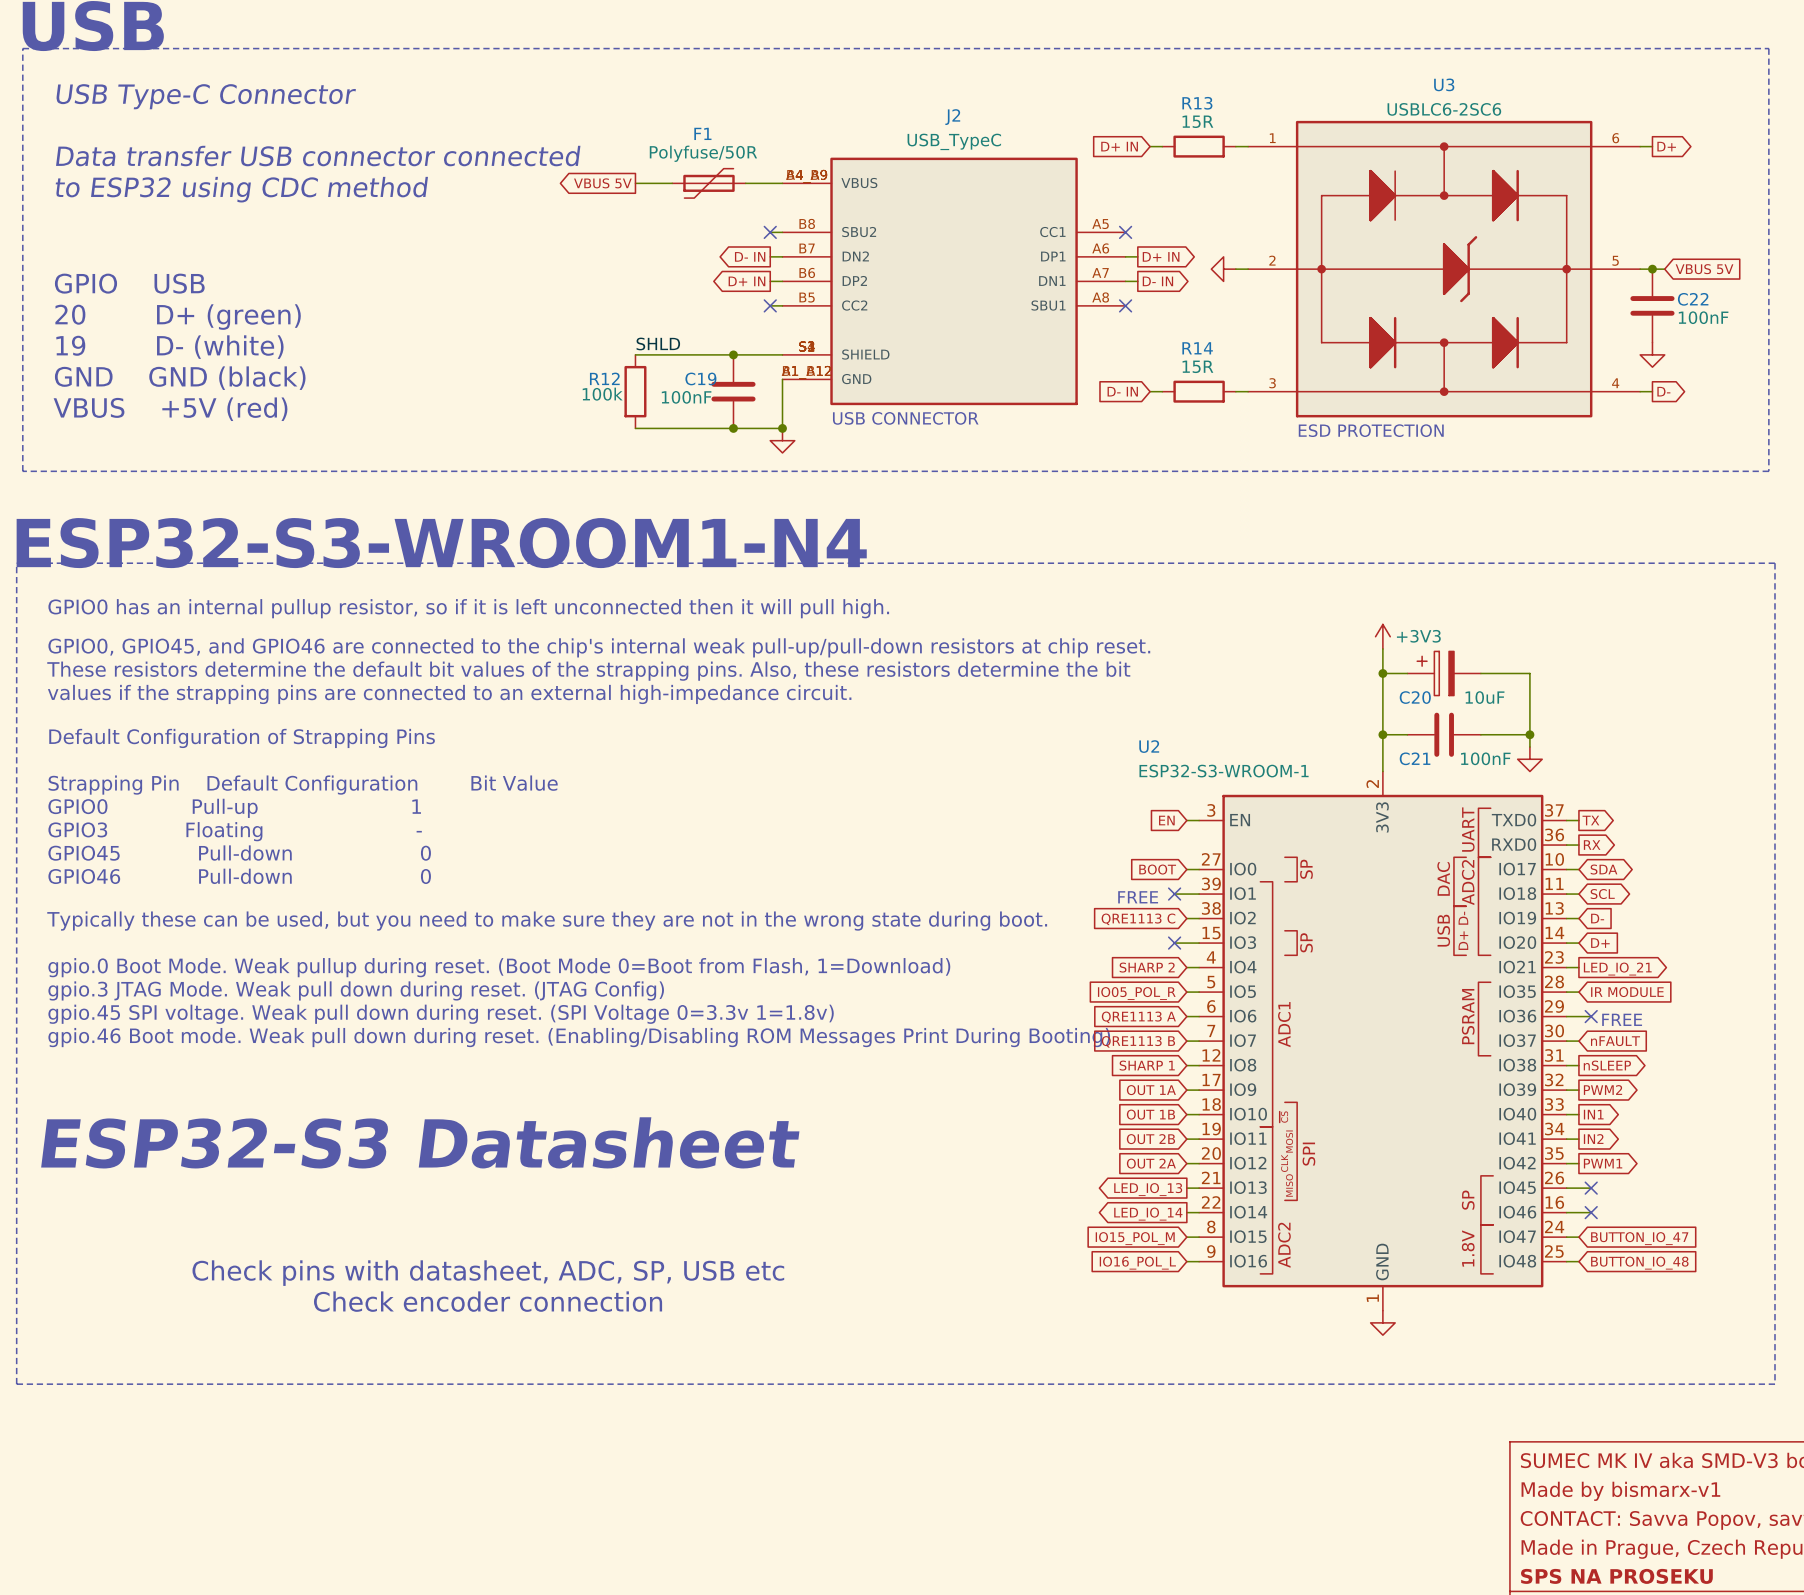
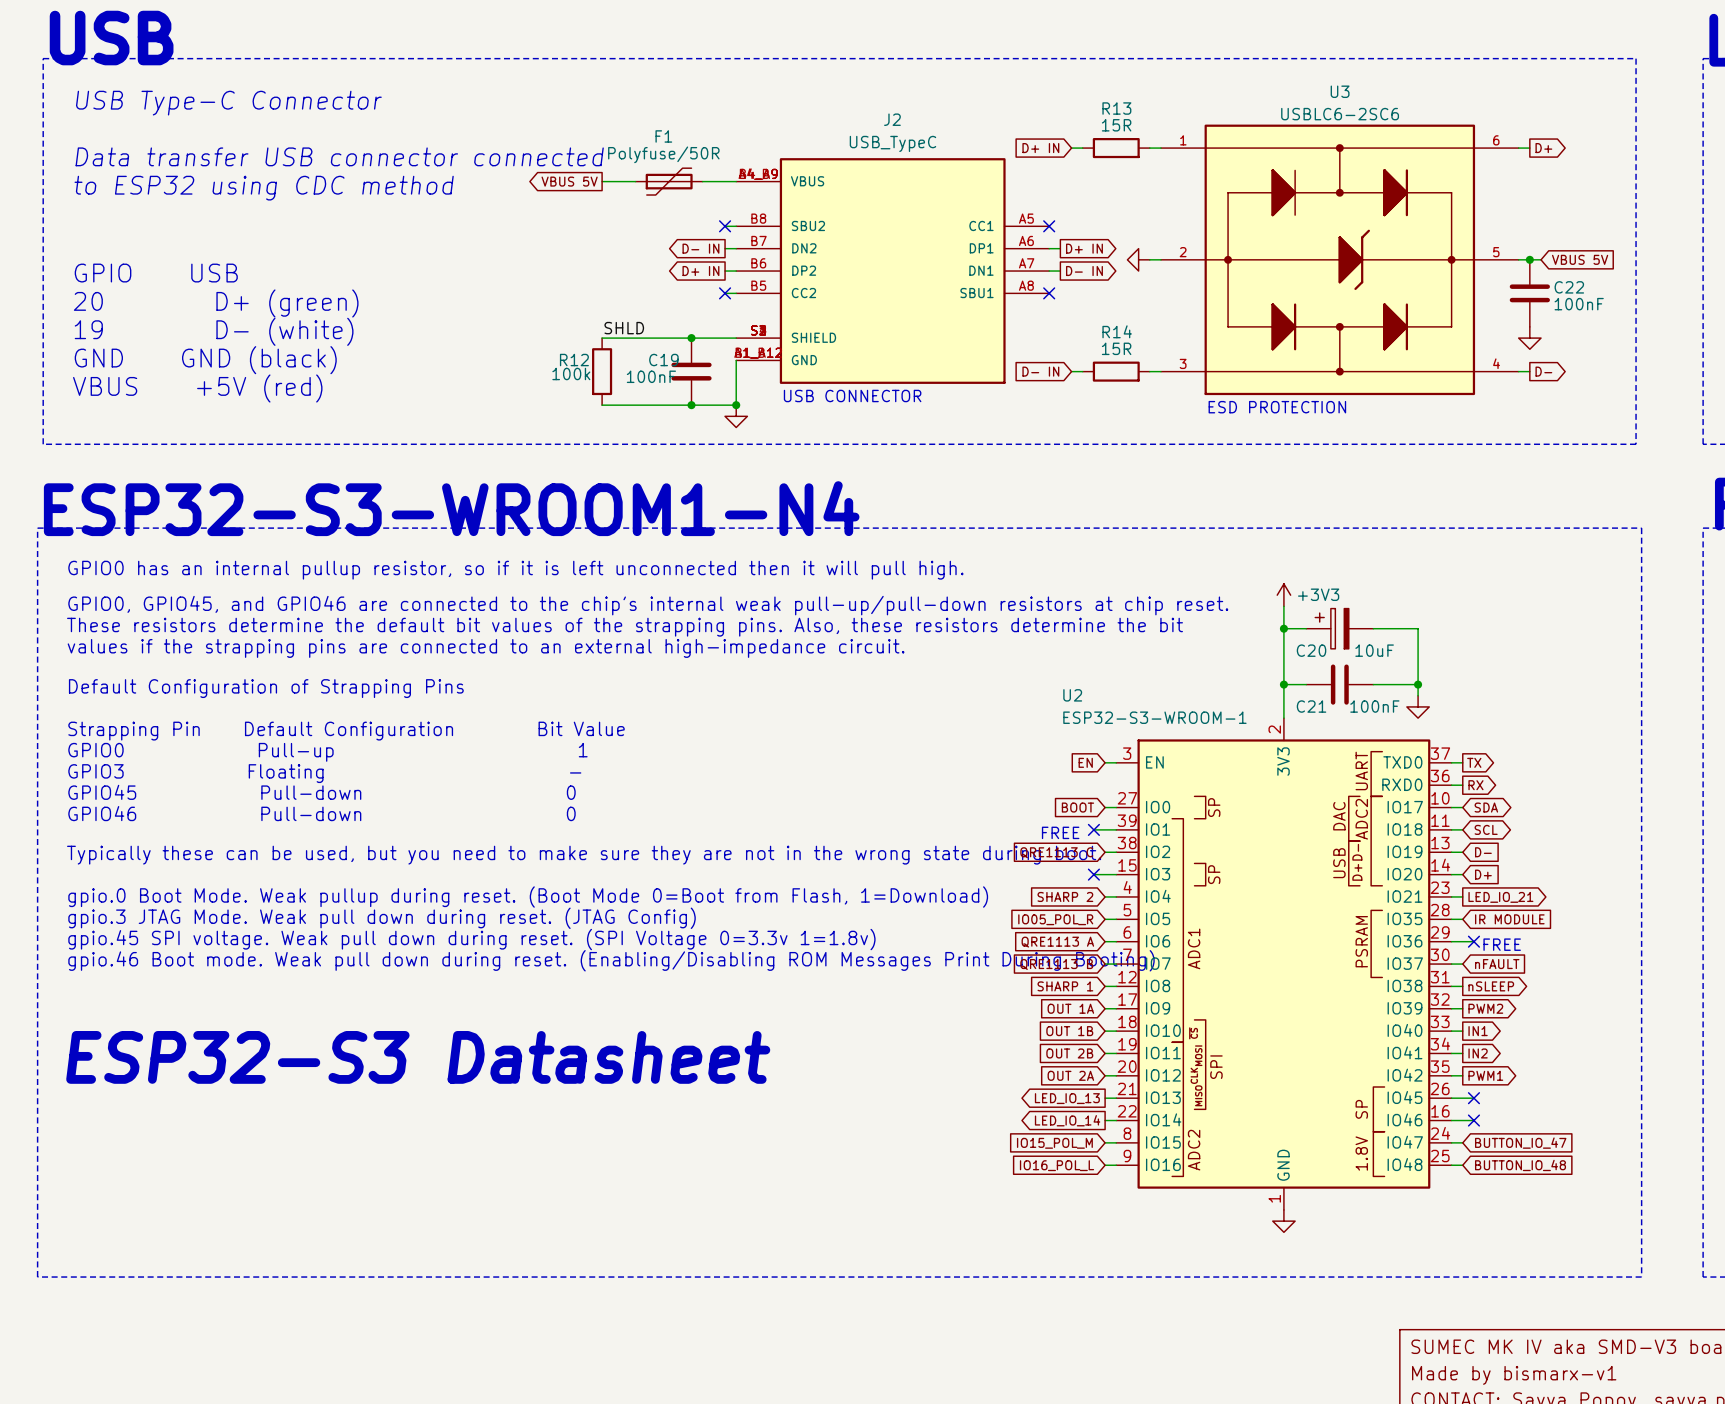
text: Check pins with datasheet, ADC, SP, USB etc (488, 1273) -> none
text: Check encoder connection (488, 1301) -> none

